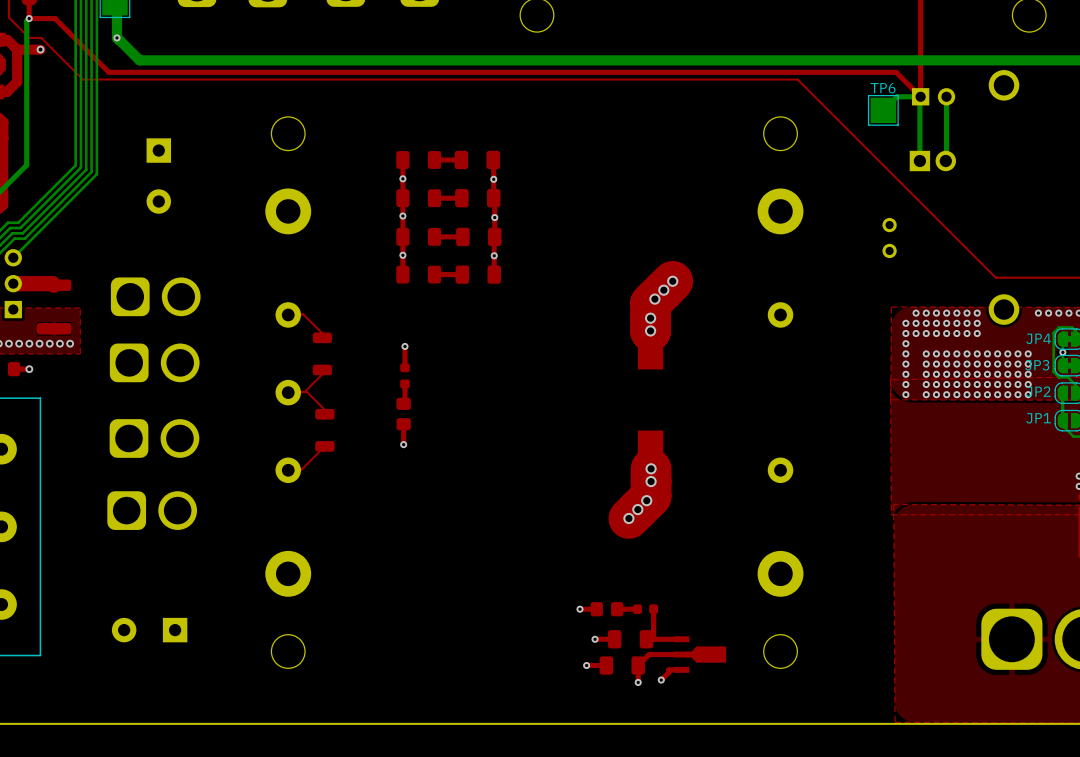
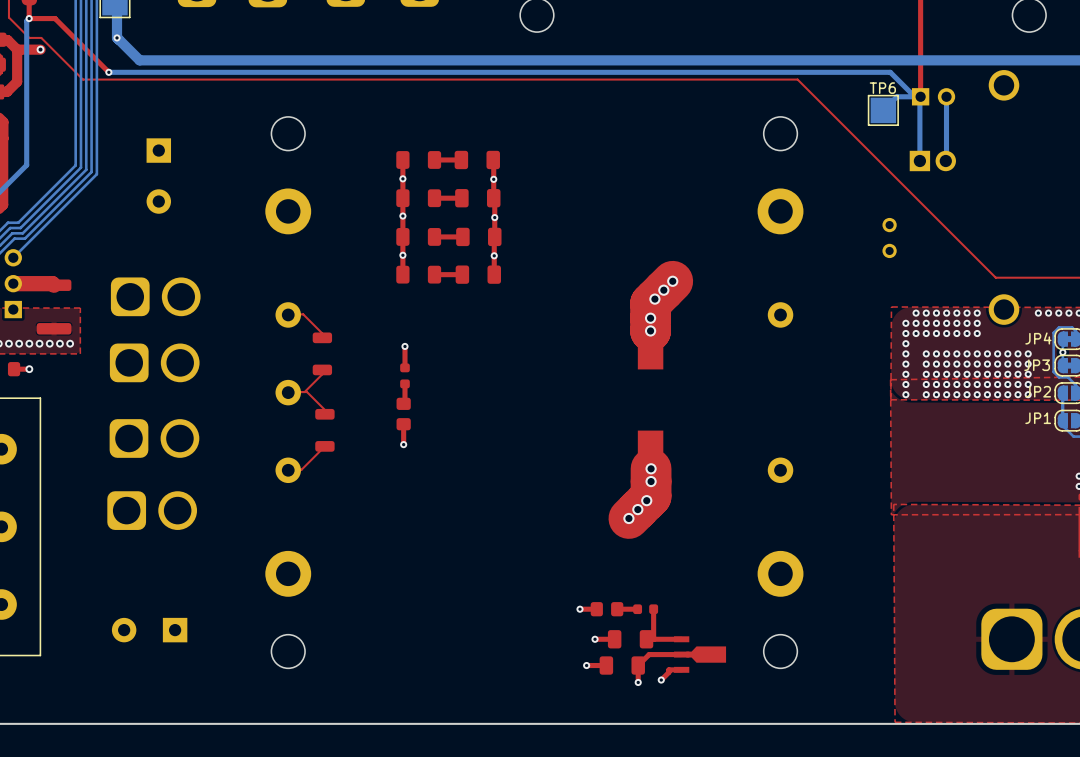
top track: (108, 72) (896, 72) (920, 96) -> none
bottom track: none -> (108, 72) (890, 72) (914, 96)
via: none -> (108, 72)

